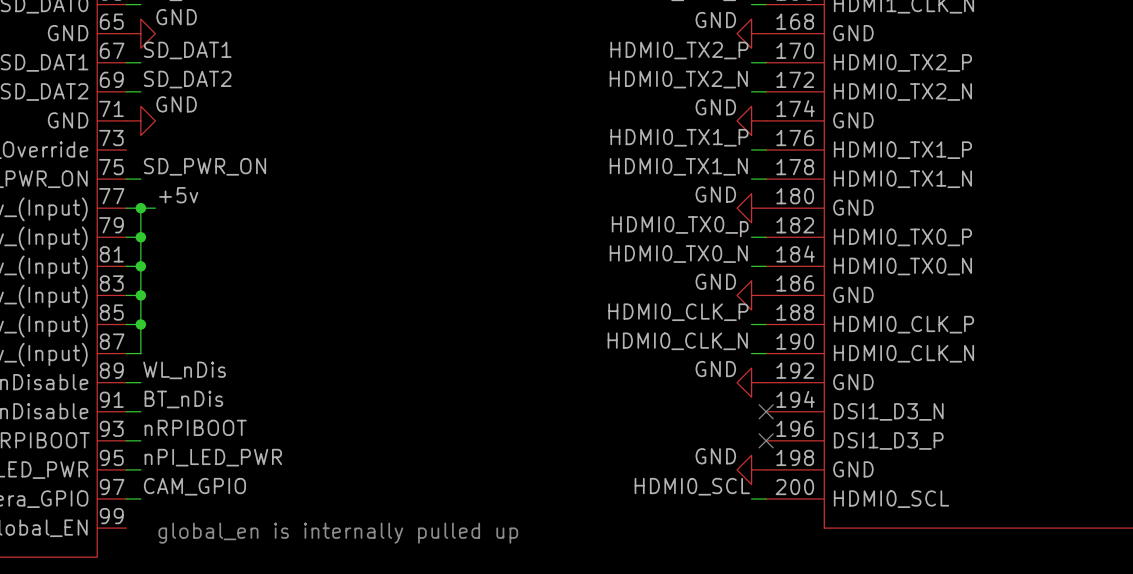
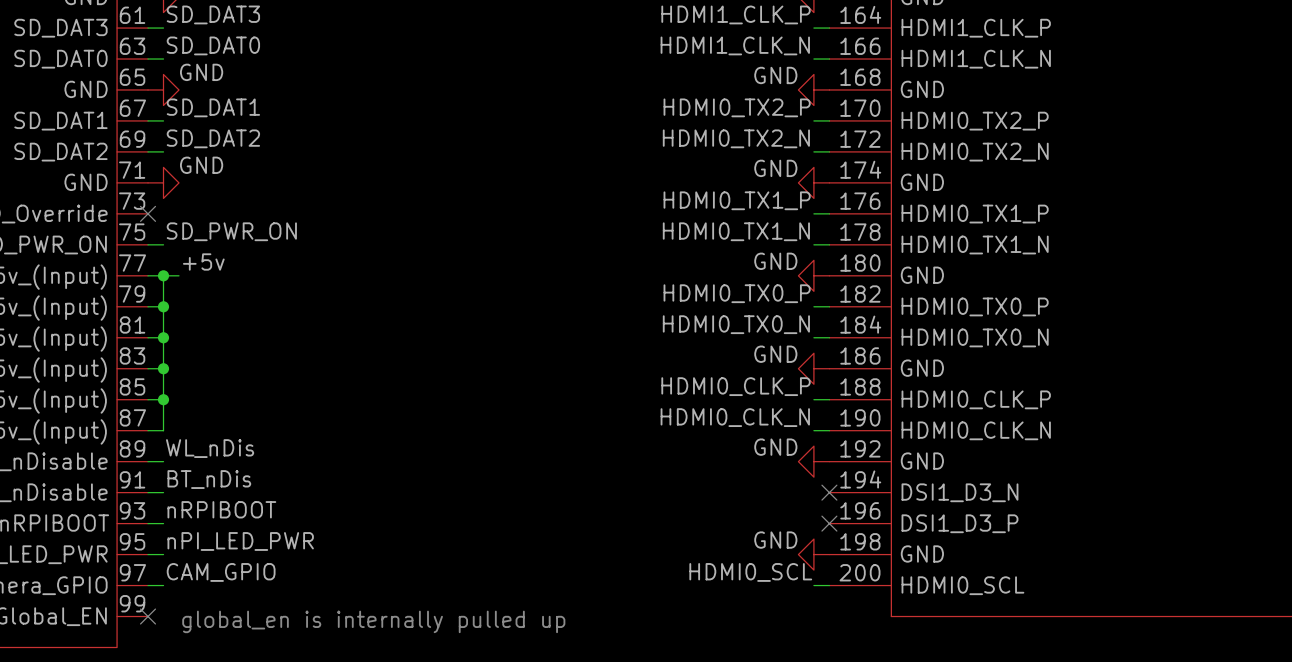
no-connect mark: none -> (148, 213)
label: HDMI0_TX0_p (680, 226) -> HDMI0_TX0_P (737, 293)
no-connect mark: none -> (148, 616)

